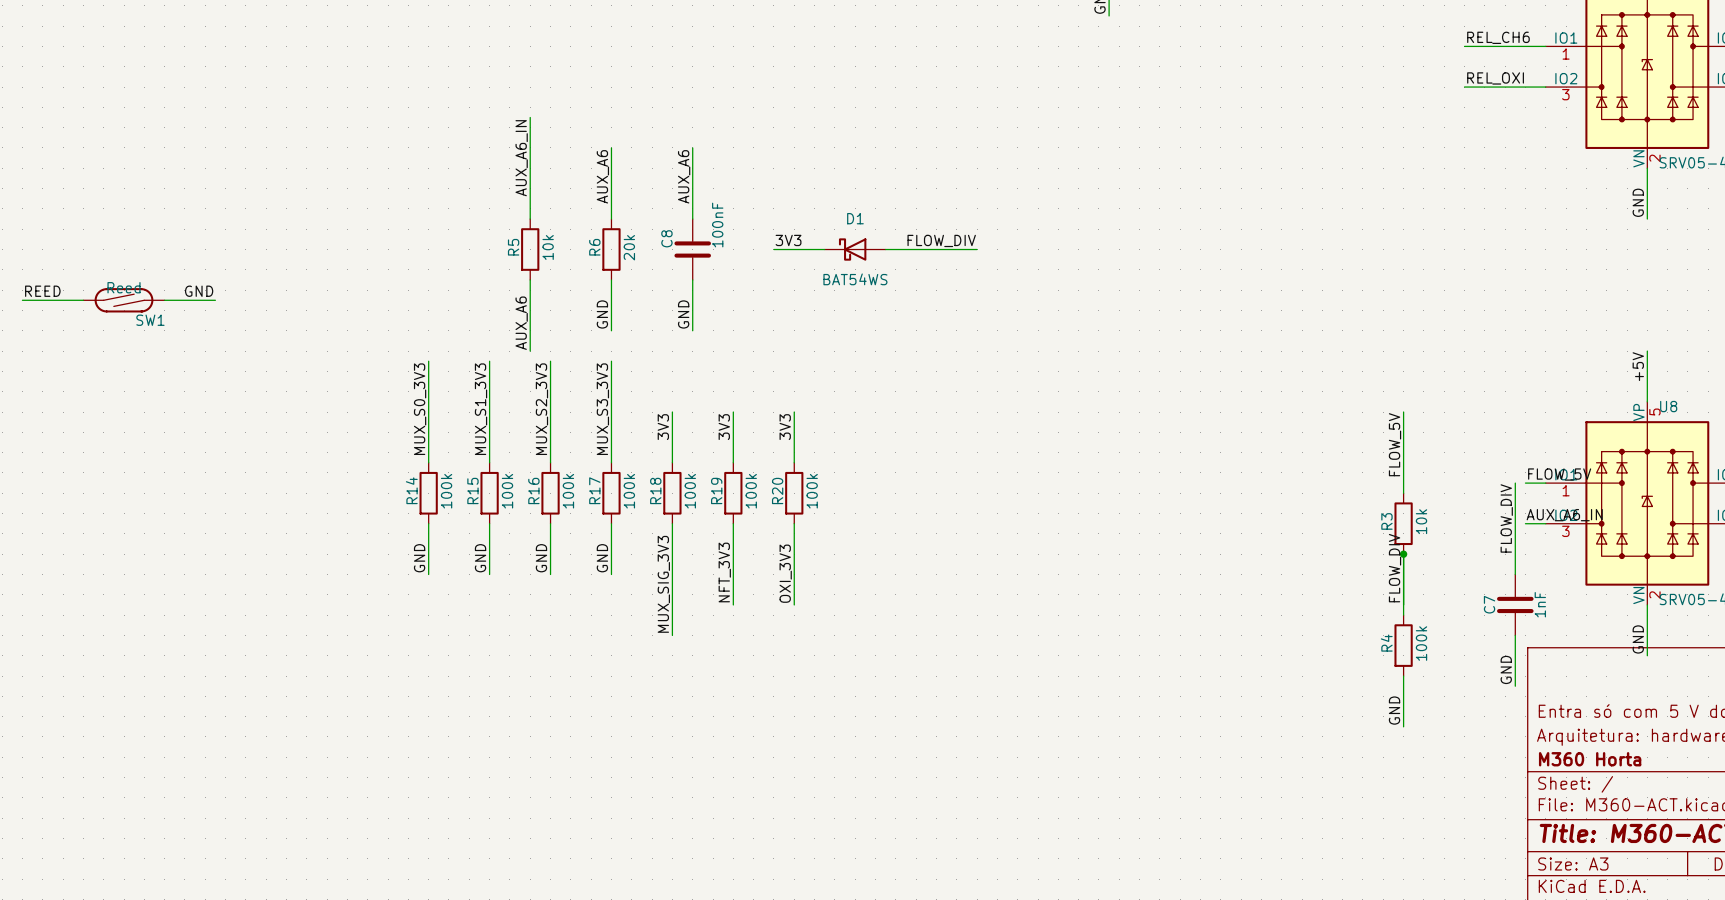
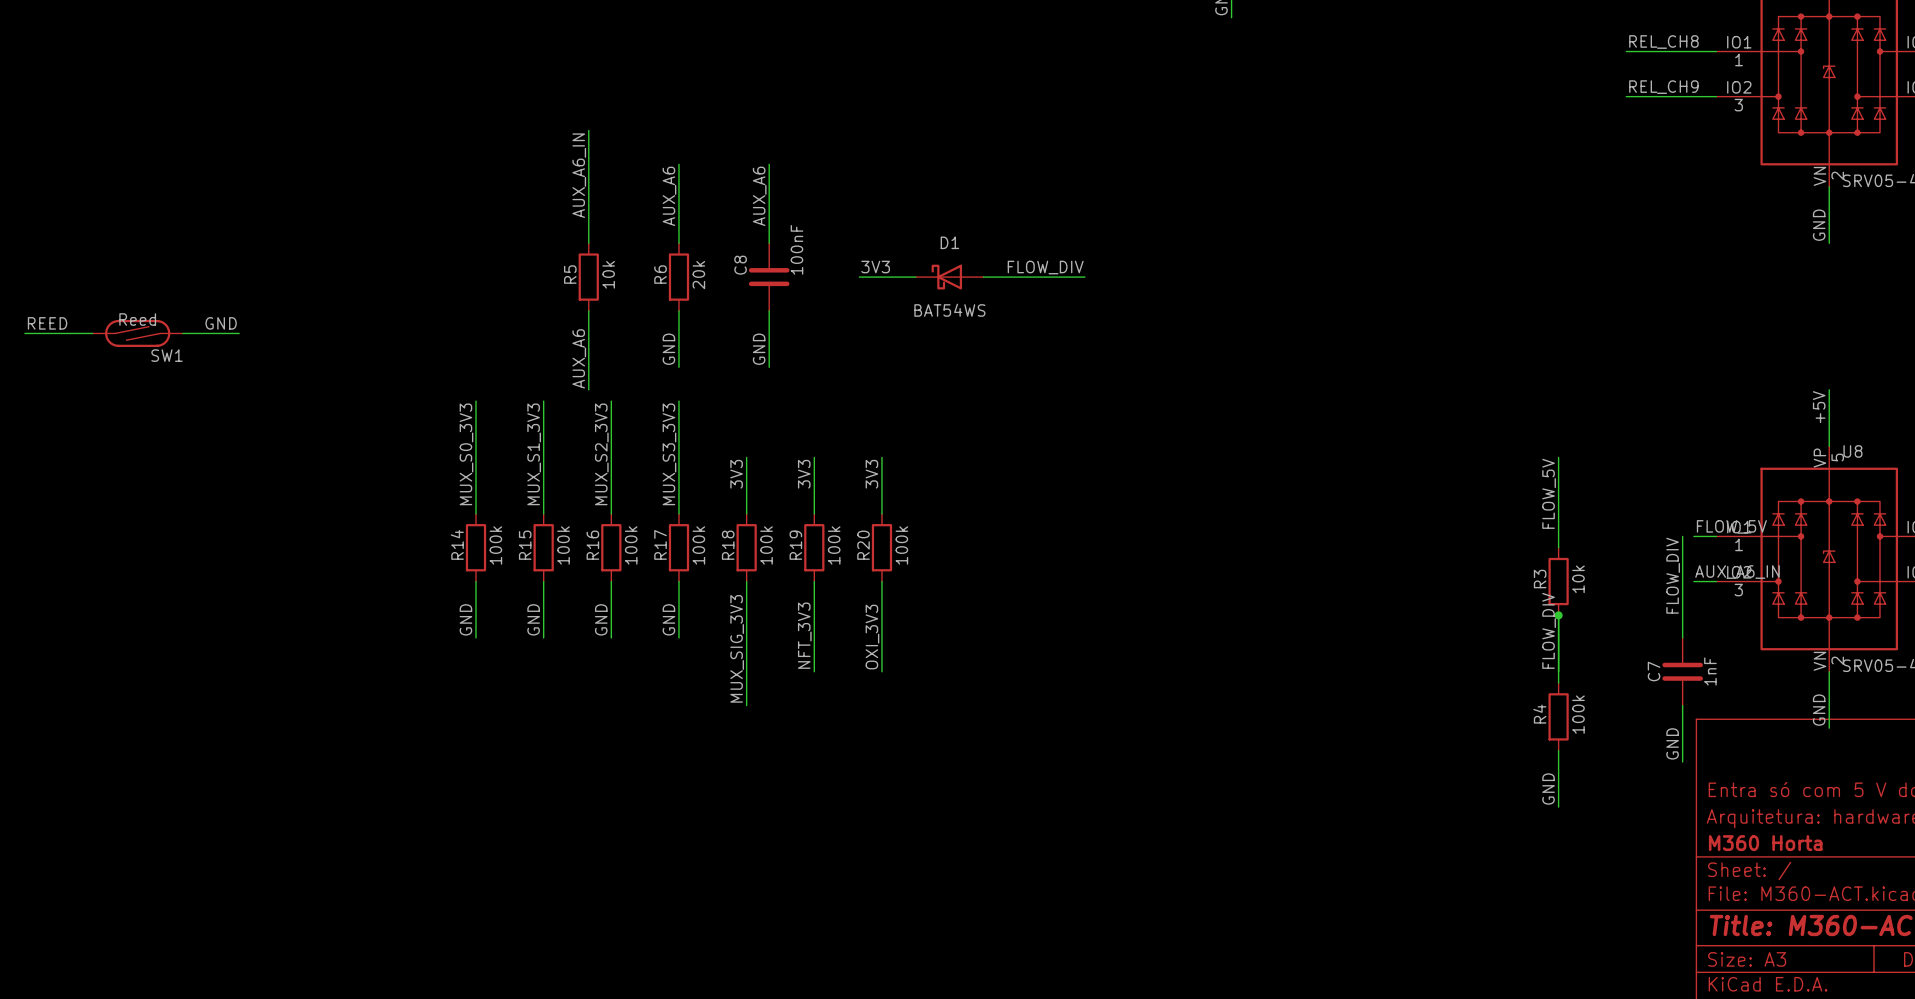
label: REL_CH6 (1498, 37) -> REL_CH8 (1663, 42)
label: REL_OXI (1495, 78) -> REL_CH9 (1663, 87)

